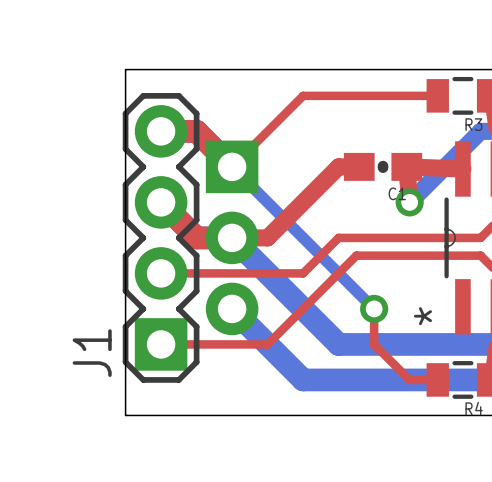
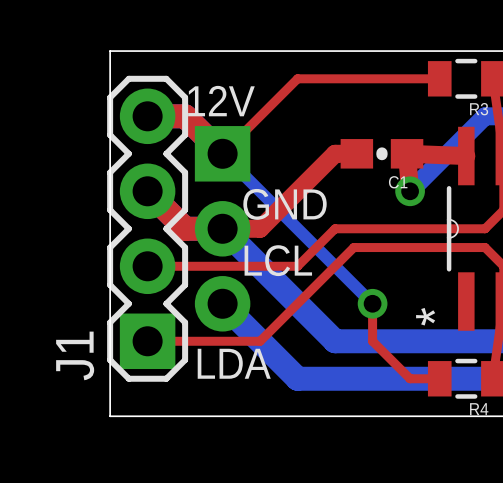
text: none -> 12V (221, 101)
text: none -> GND (285, 204)
text: none -> LCL (278, 260)
text: none -> LDA (234, 363)

